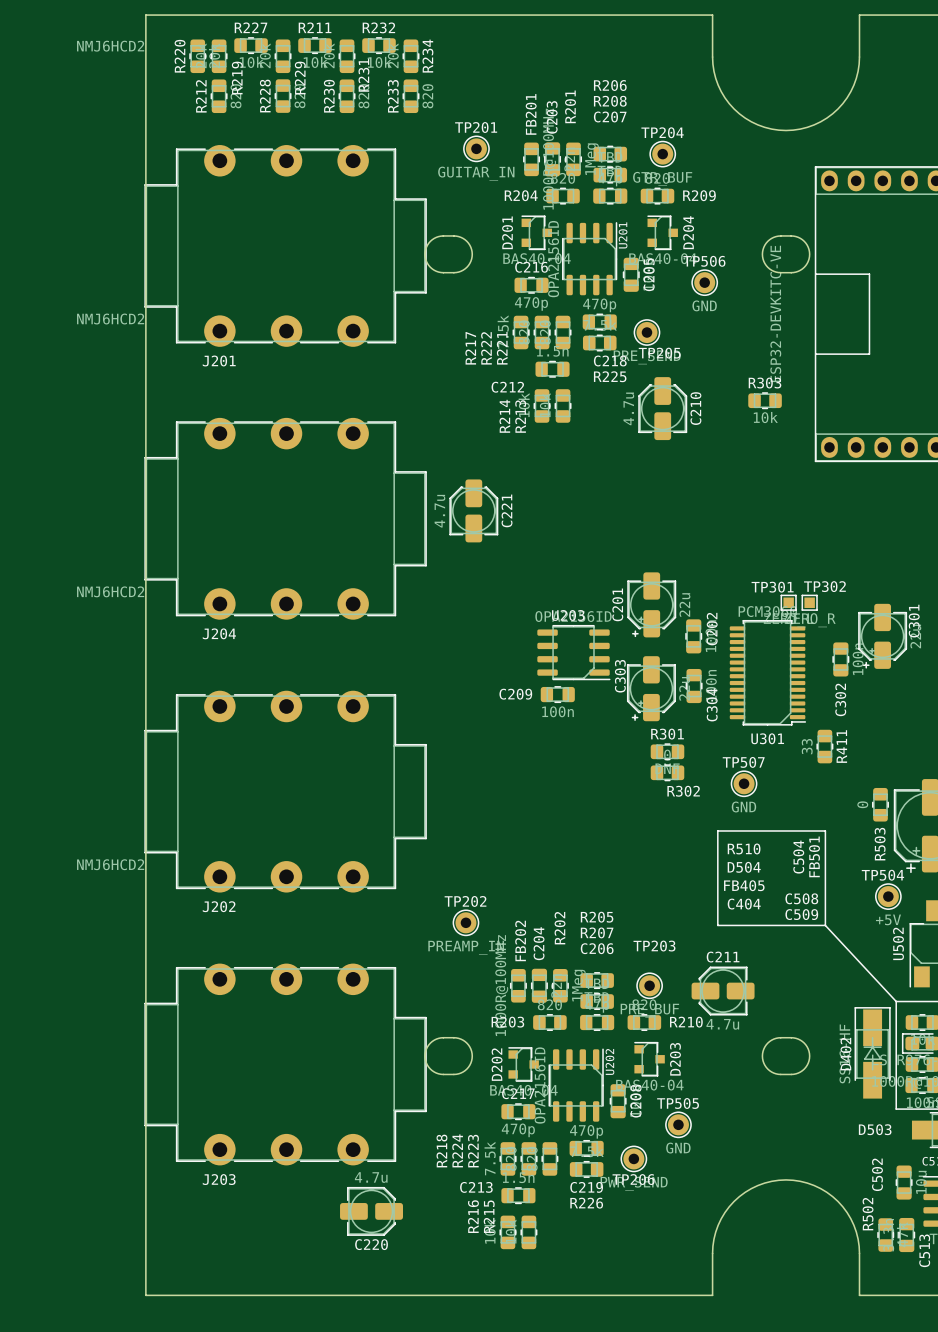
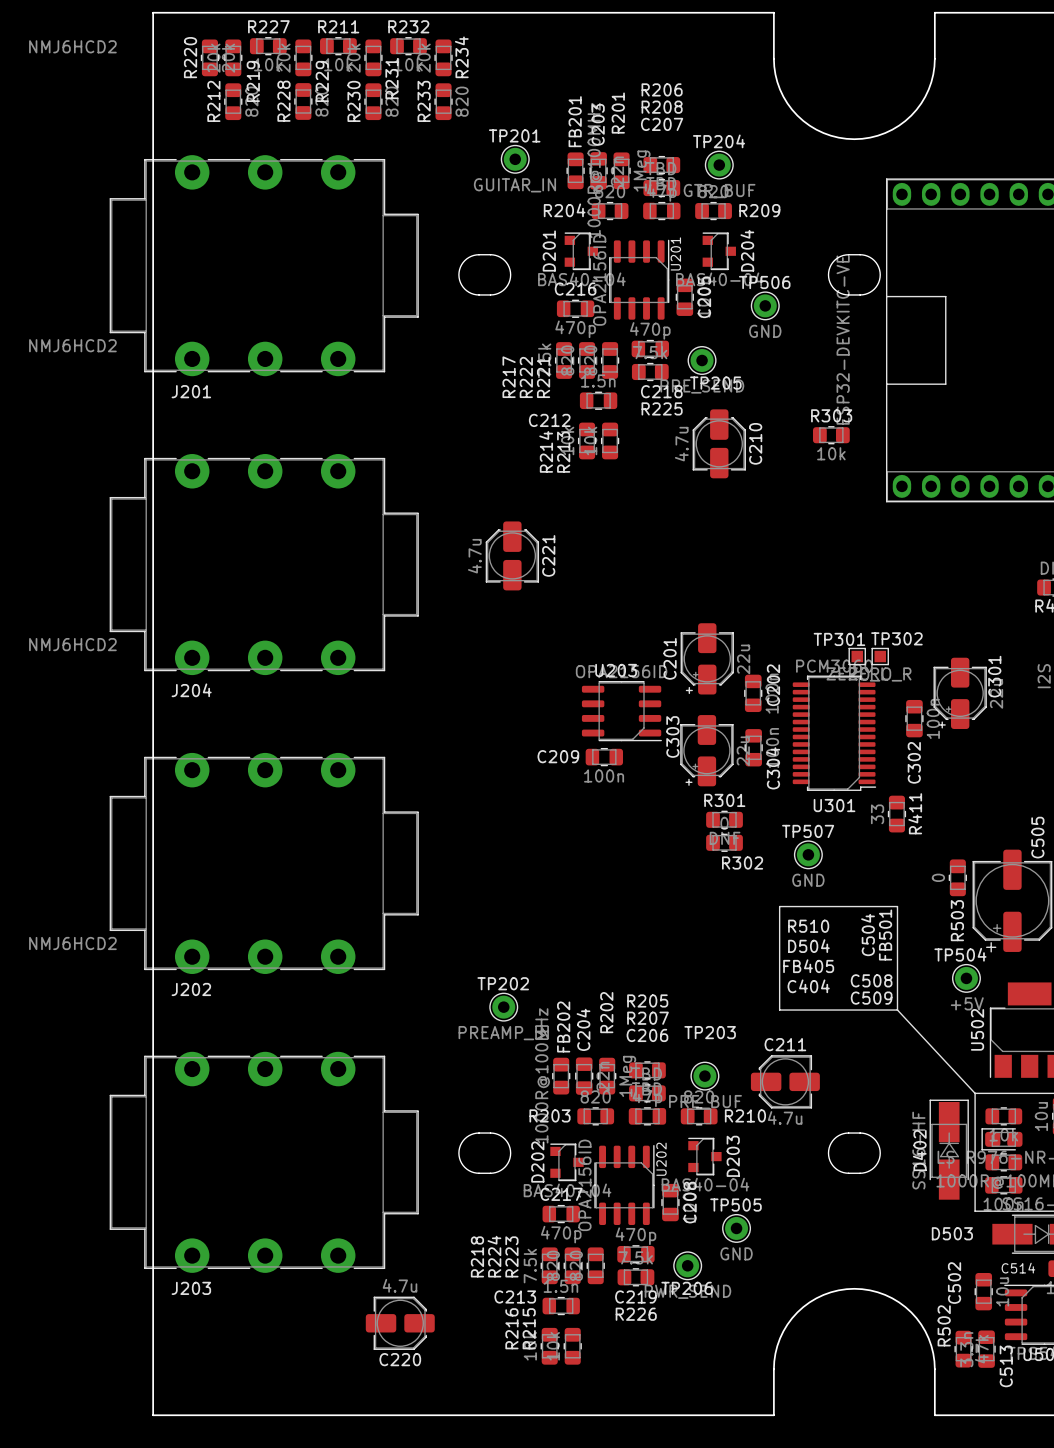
J201 position: (285, 245) -> (264, 265)
J204 position: (285, 518) -> (264, 564)
J202 position: (285, 791) -> (264, 863)
J203 position: (285, 1064) -> (264, 1162)

